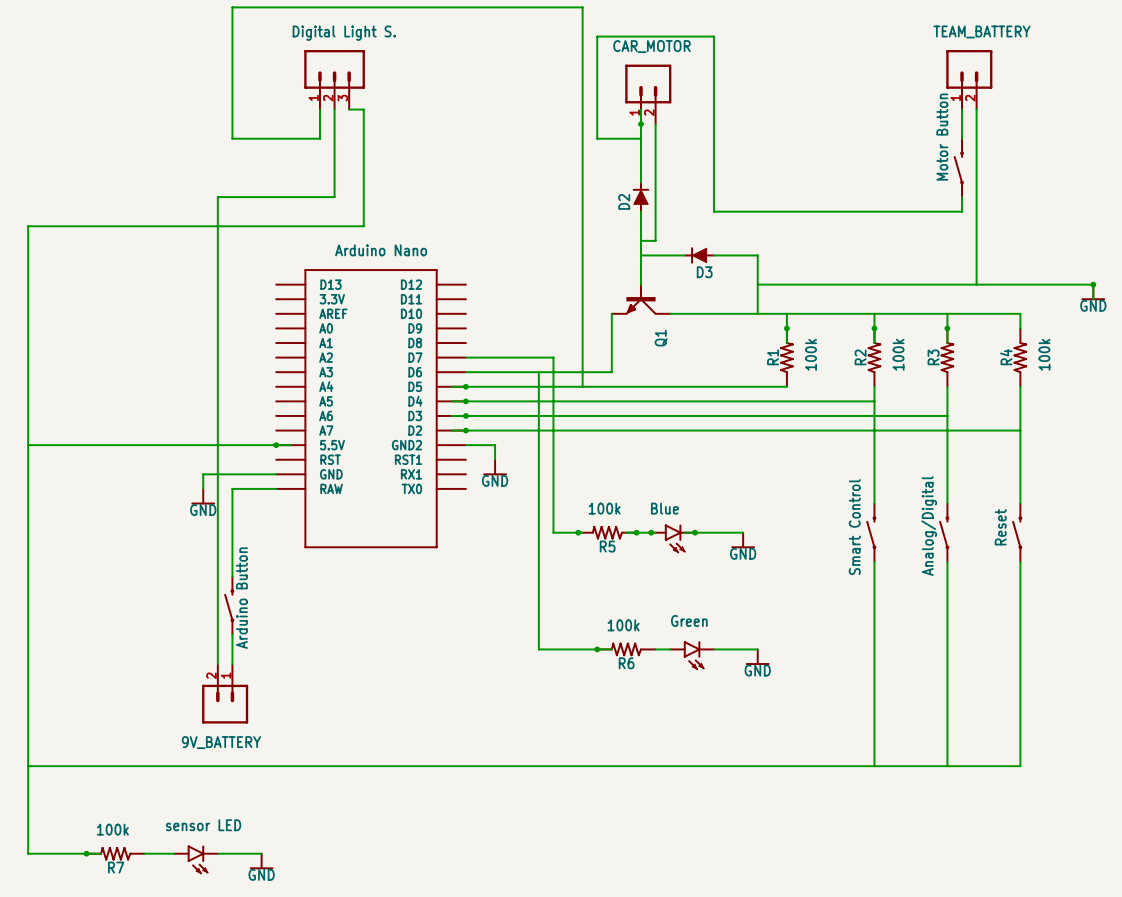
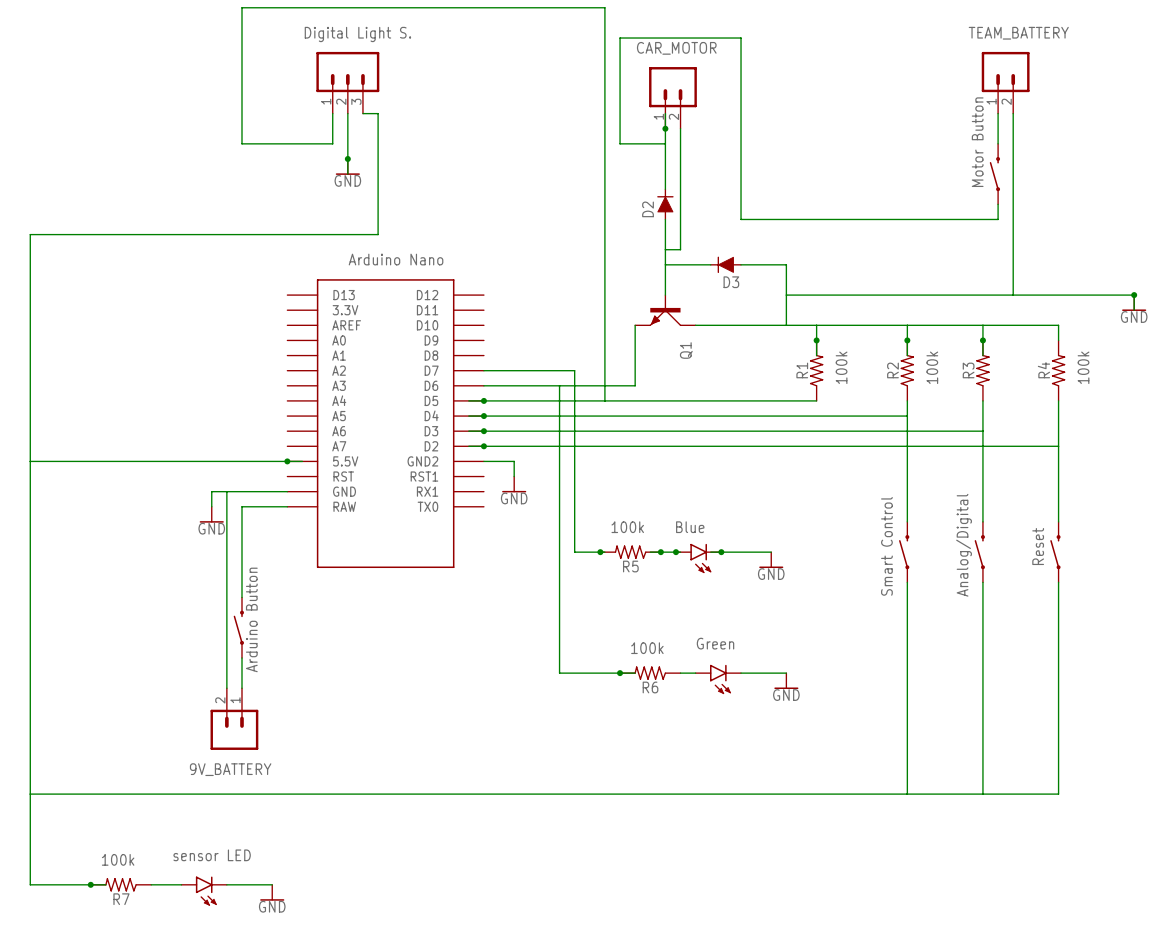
junction: none -> (347, 158)
power symbol: none -> GND (347, 166)
wire: (334, 167) (334, 197) (217, 197) (217, 474) -> none

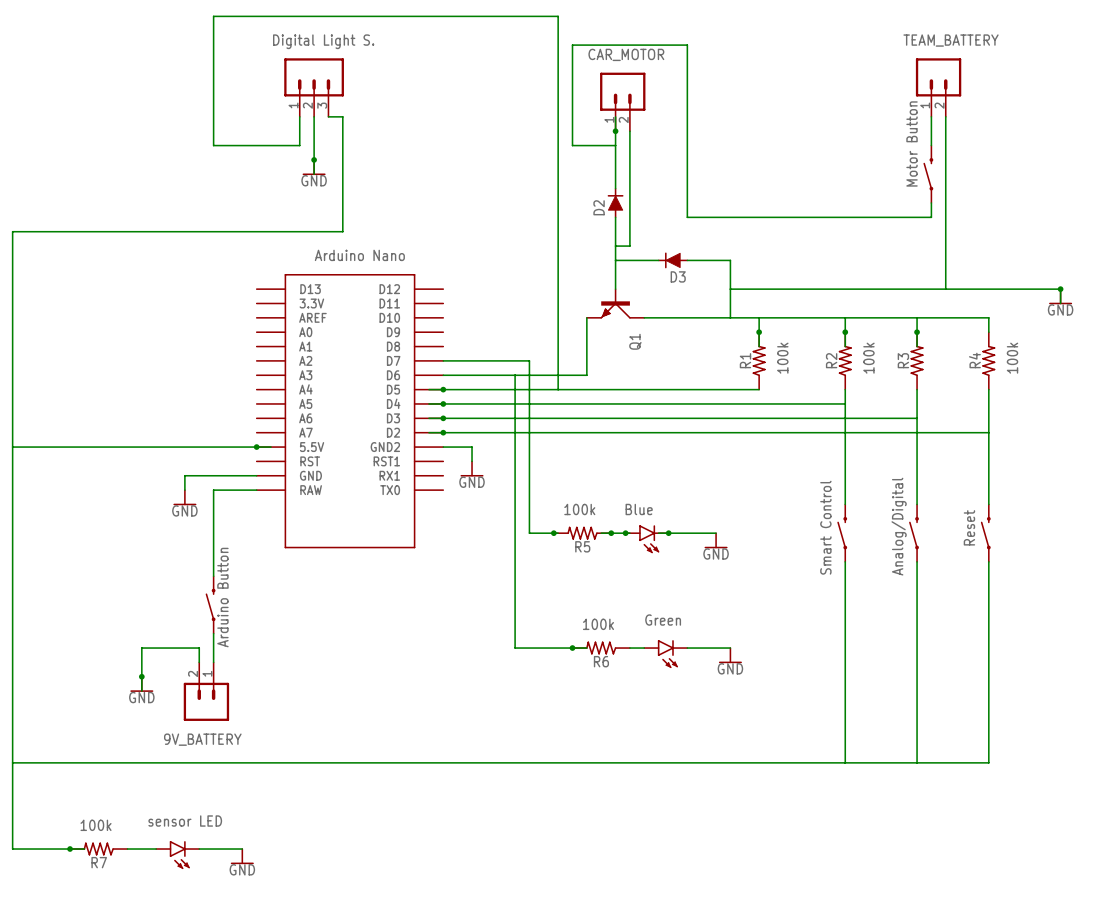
wire: (226, 491) (226, 673) -> (141, 691) (141, 648) (199, 648)
junction: none -> (141, 676)
power symbol: none -> GND (141, 684)

